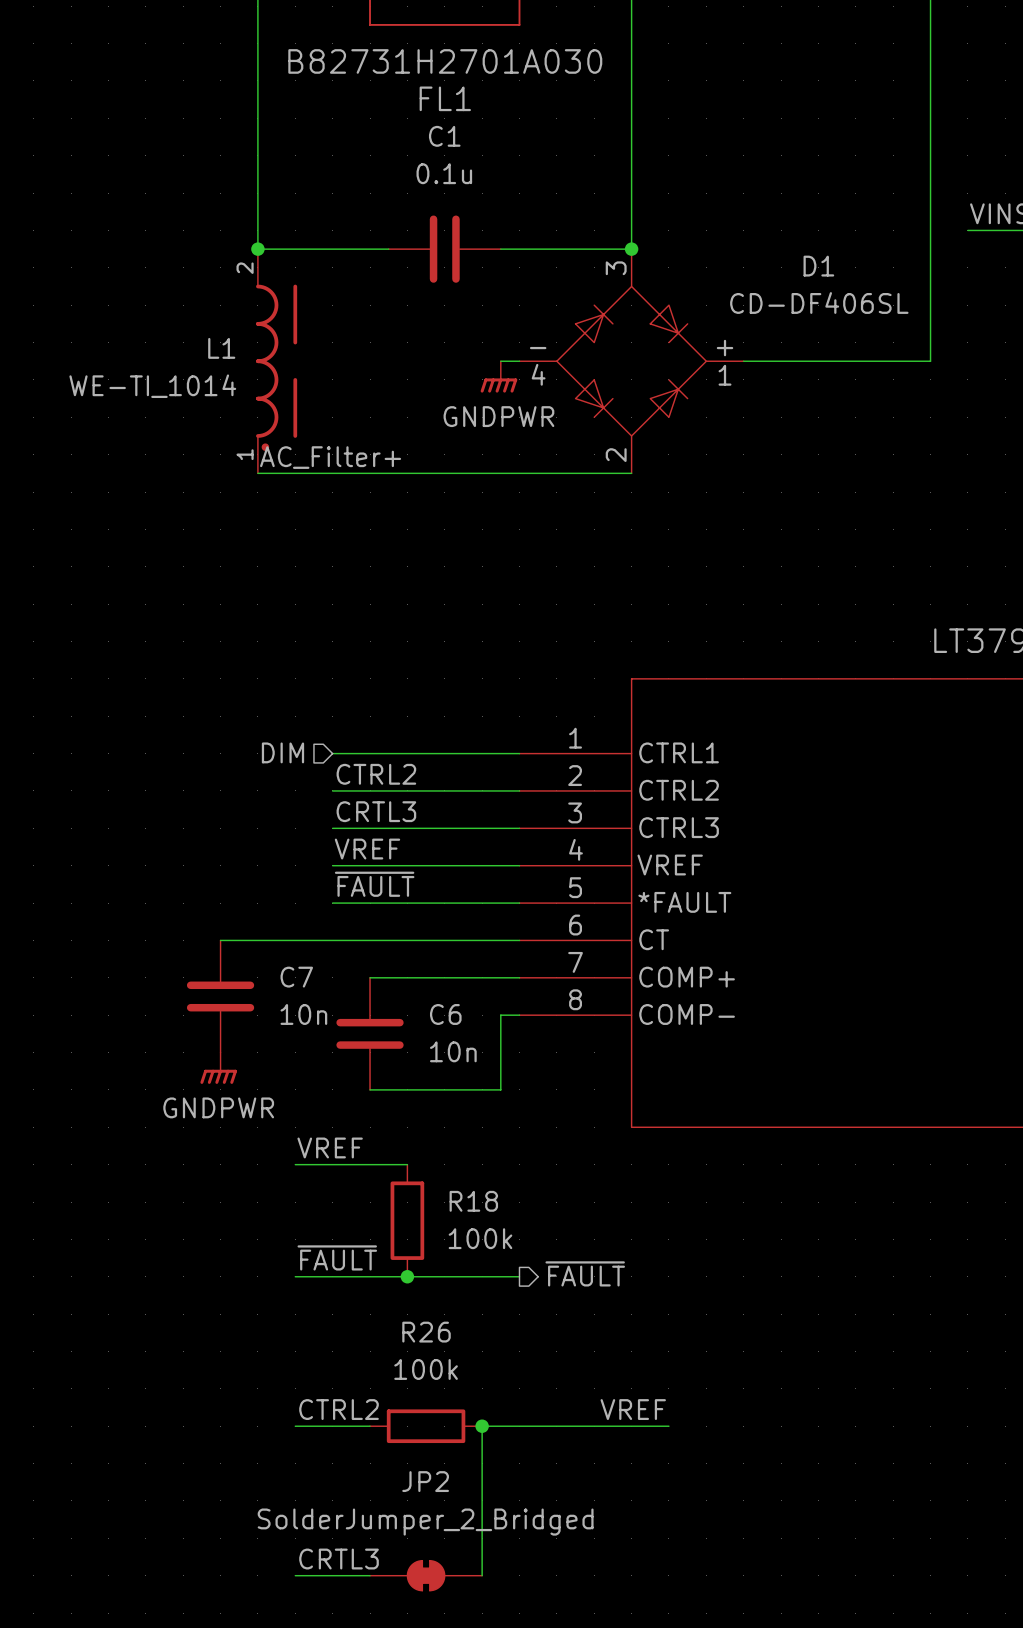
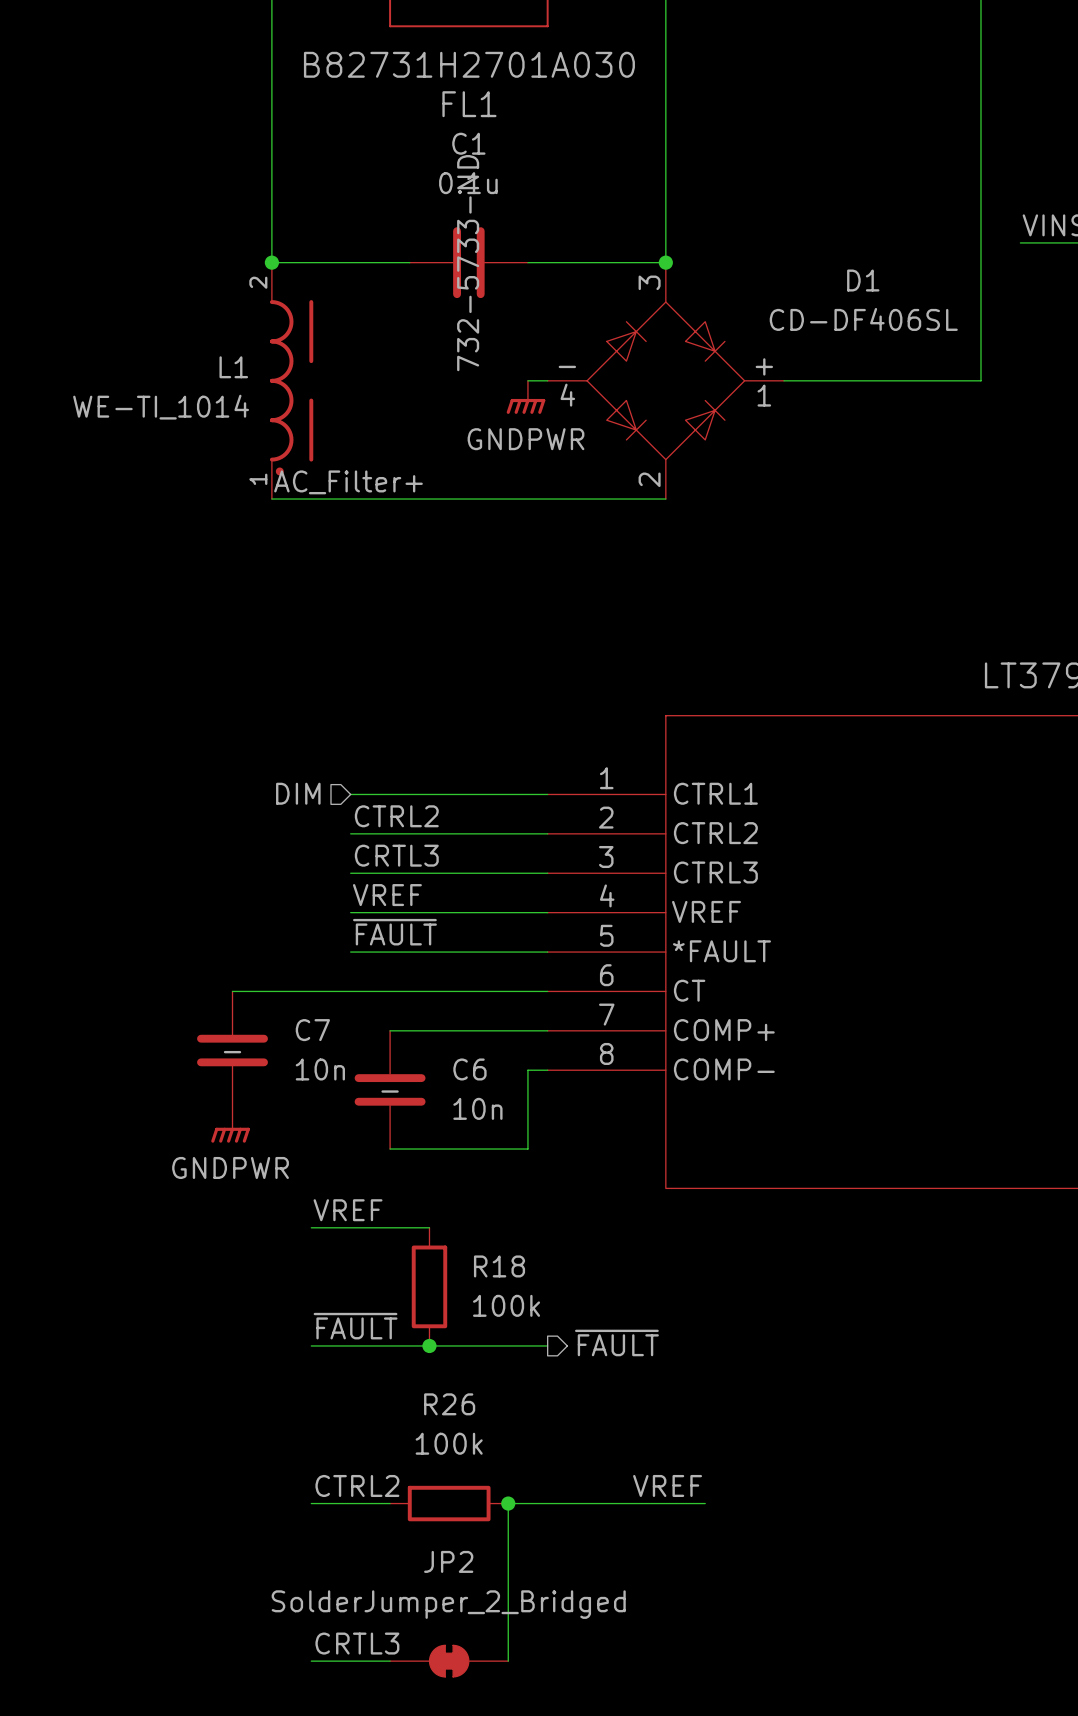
C1 text: none -> 732-5733-ND (468, 263)
C7 text: none -> - (232, 1052)
C6 text: none -> - (390, 1091)

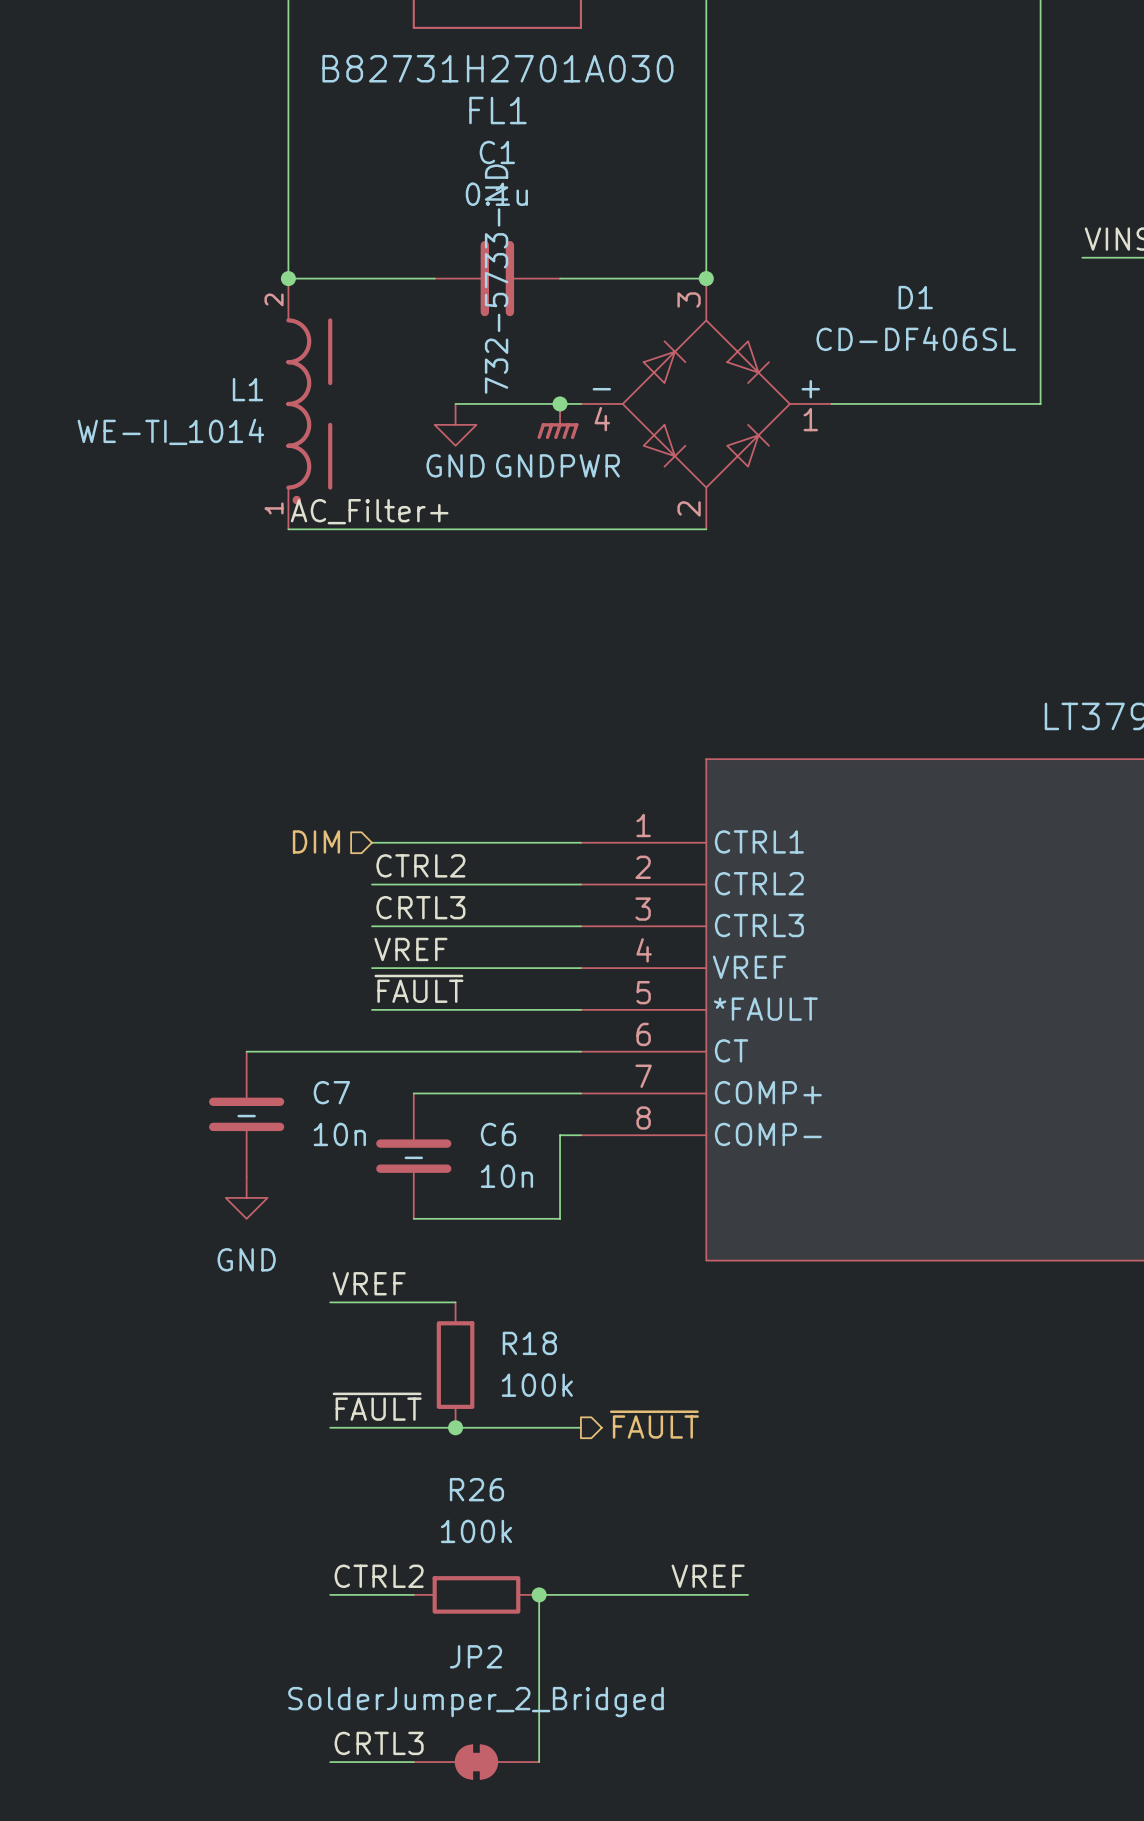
wire: none -> (455, 403) (560, 403)
junction: none -> (560, 403)
power symbol: none -> GND (455, 424)
power symbol: GNDPWR (230, 1126) -> GND (246, 1197)

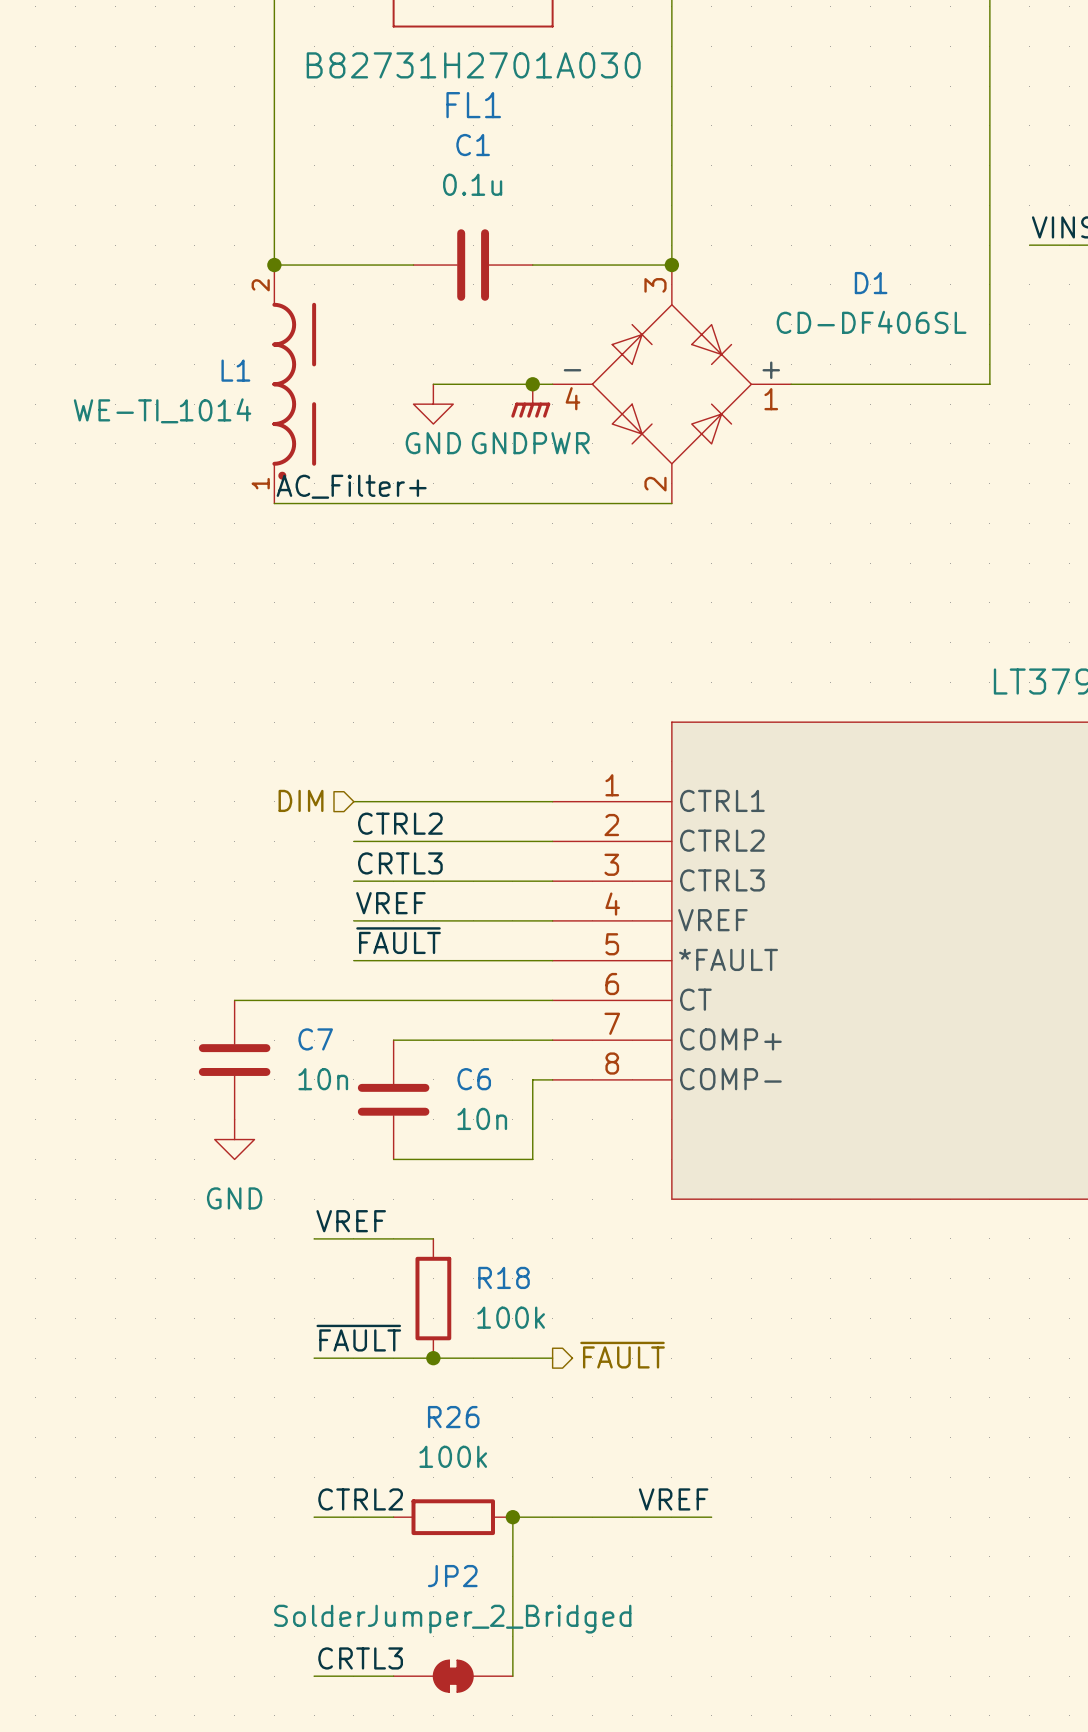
C1 text: 732-5733-ND (496, 279) -> none
C7 text: - (246, 1116) -> none
C6 text: - (413, 1157) -> none

